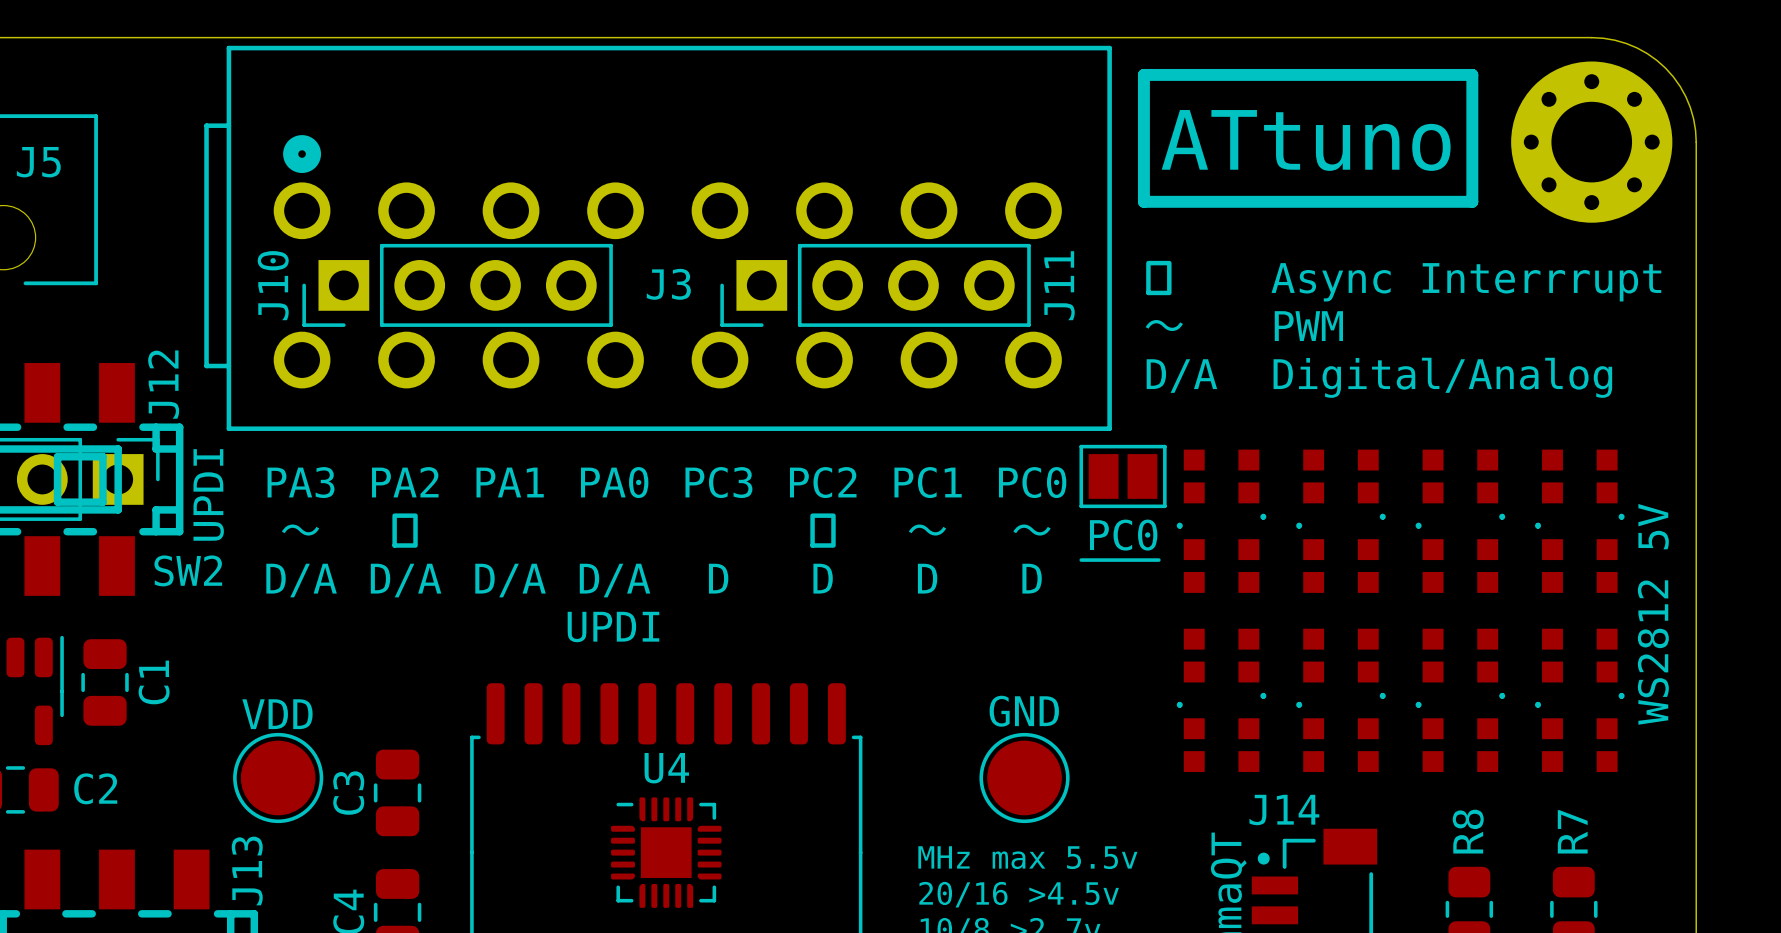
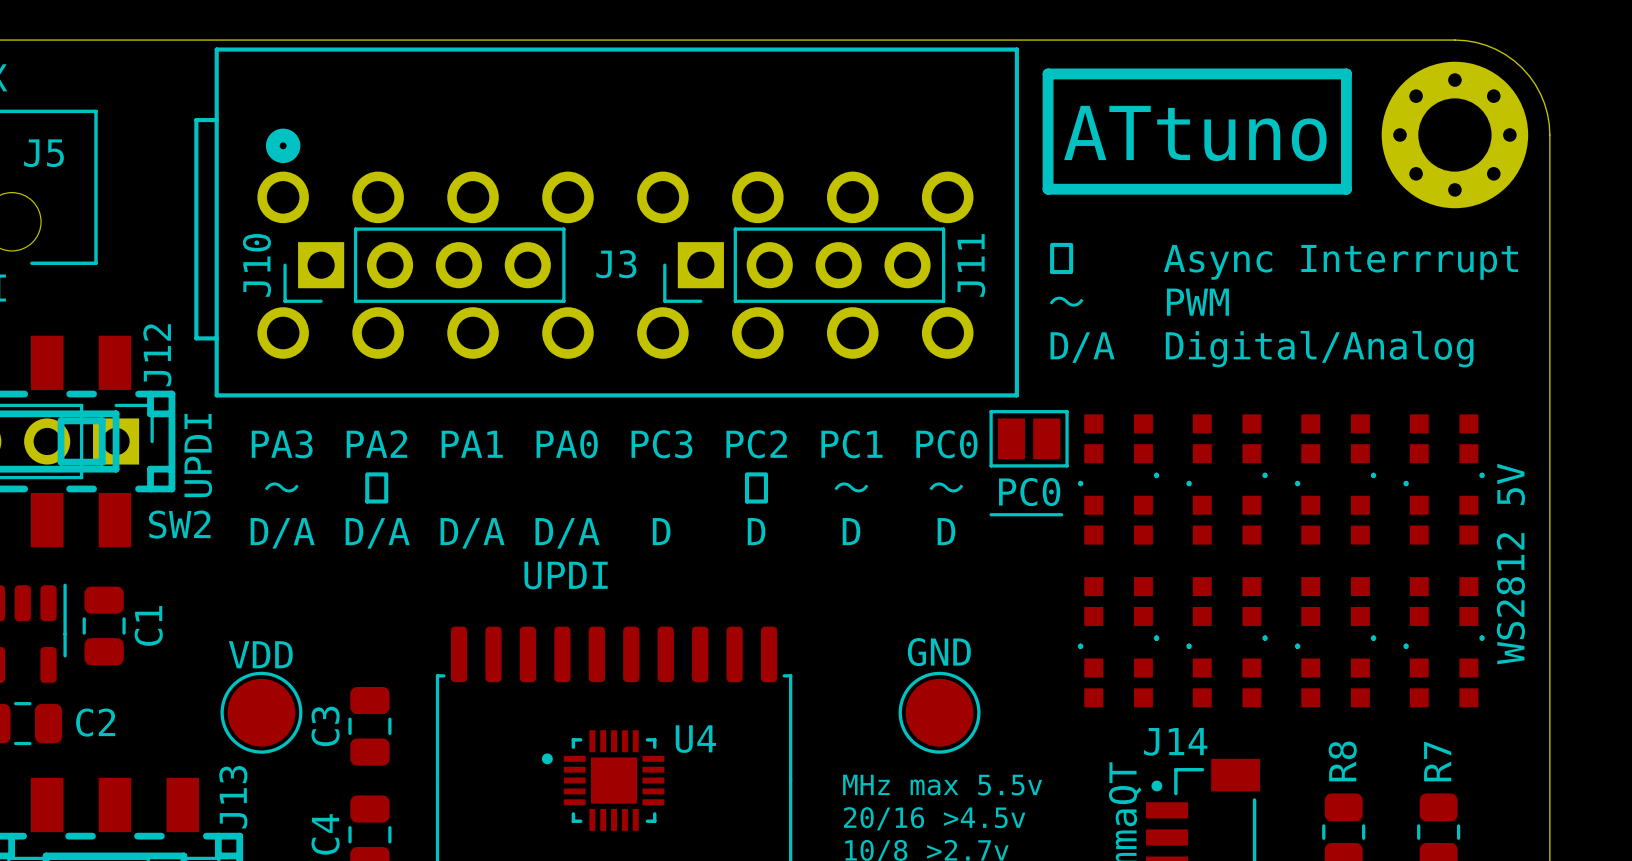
U4 name position: U4 (666, 768) -> U4 (695, 739)
U4 footprint: [611, 797, 722, 908] -> [541, 730, 665, 831]

